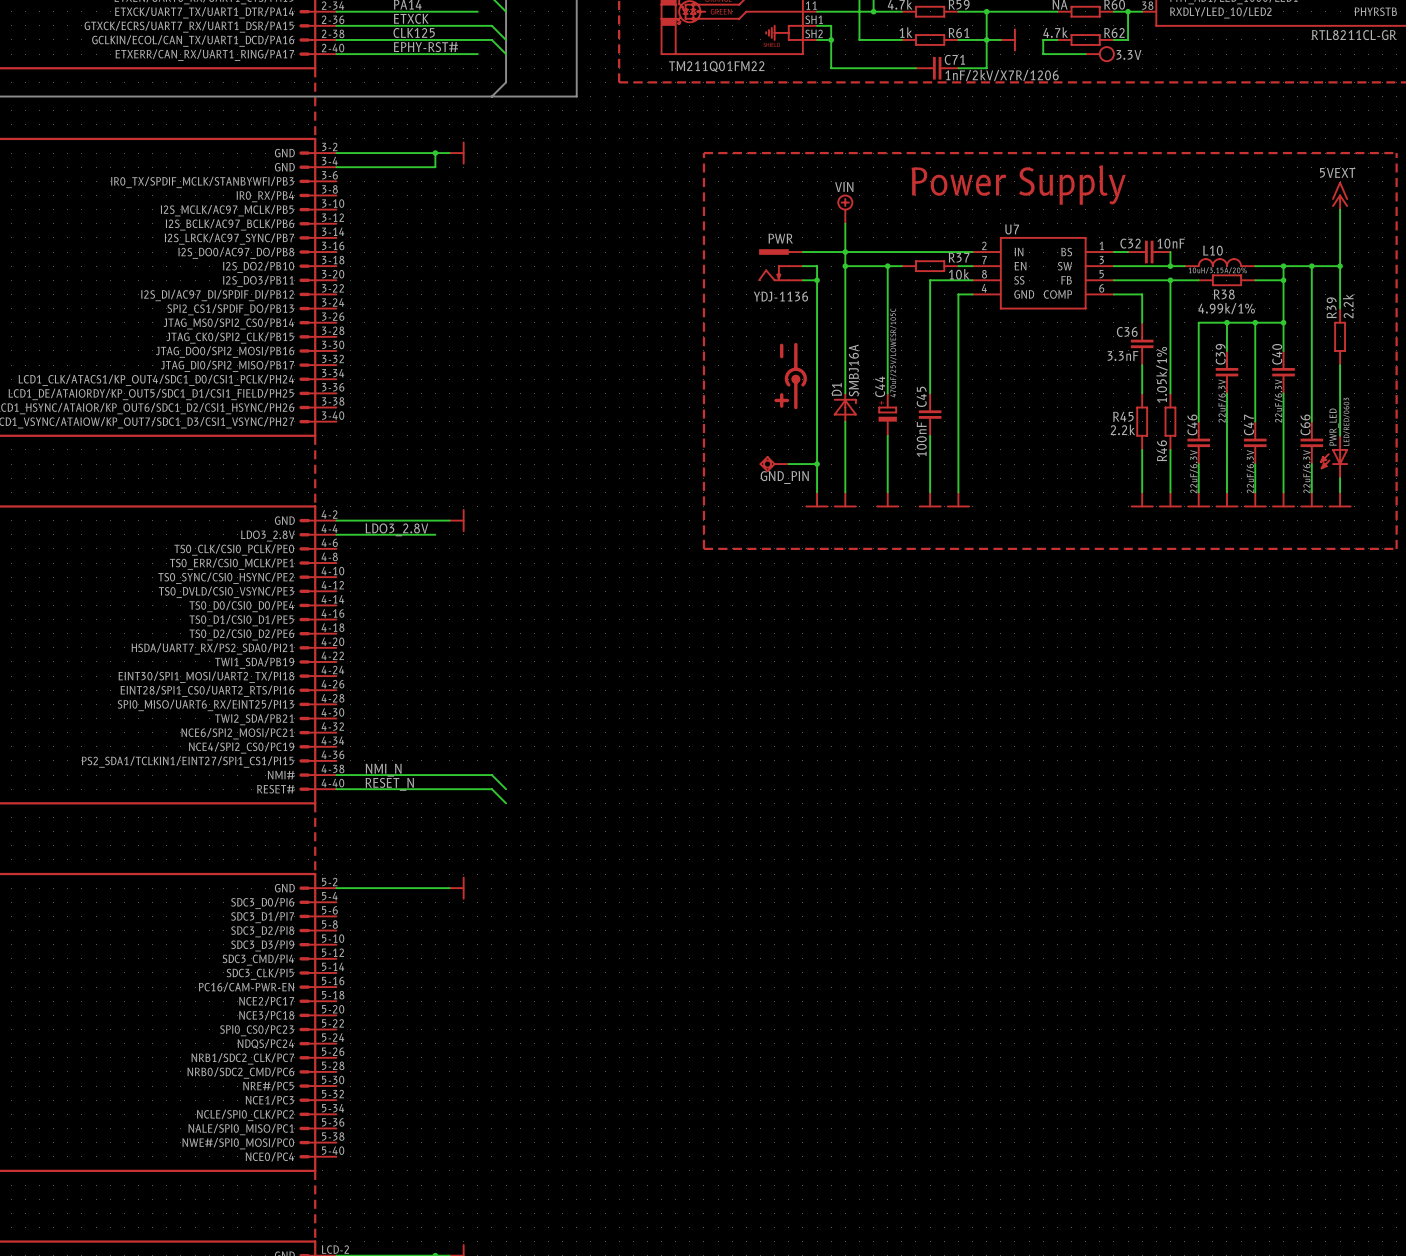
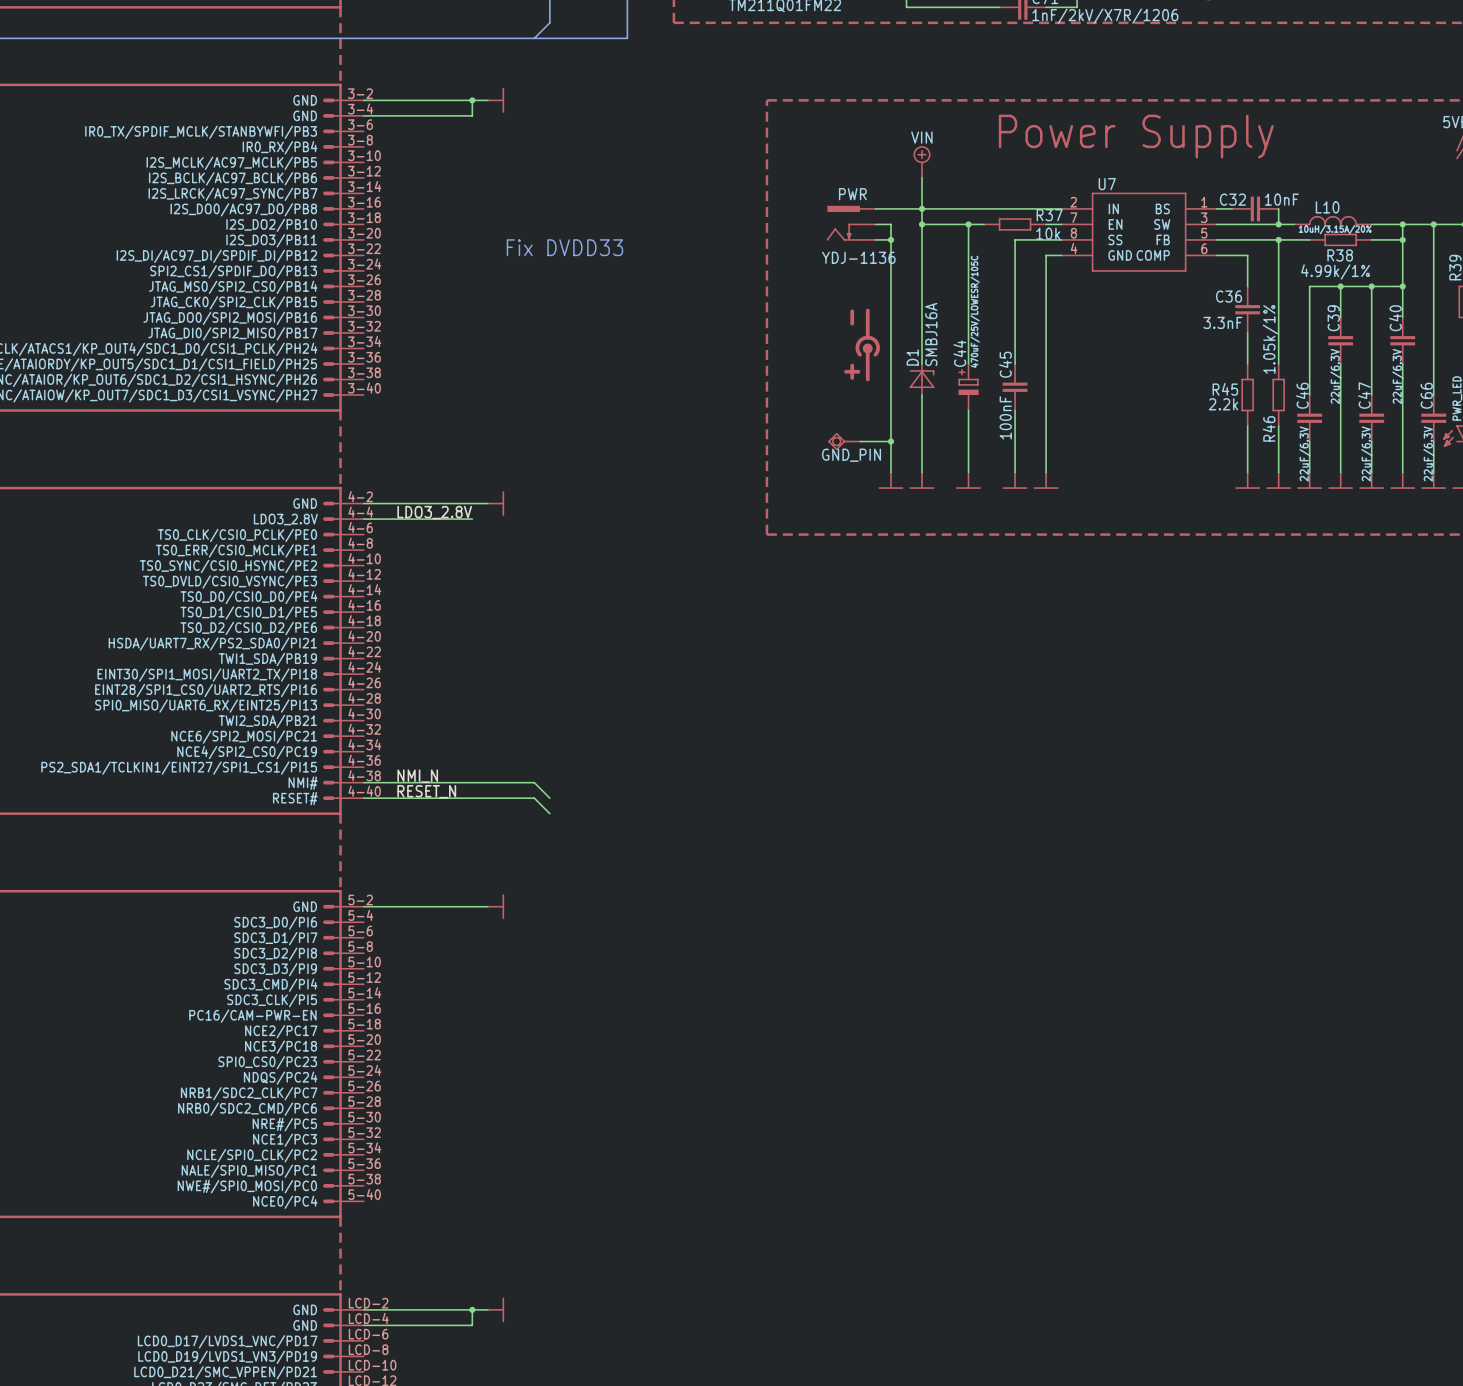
text: none -> Fix DVDD33 (564, 247)

